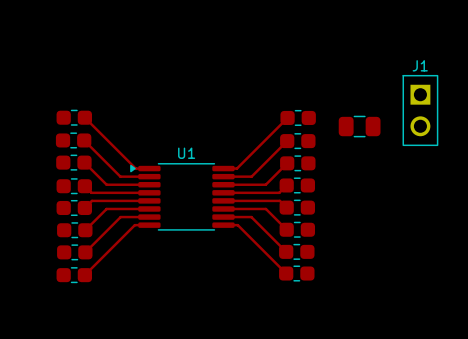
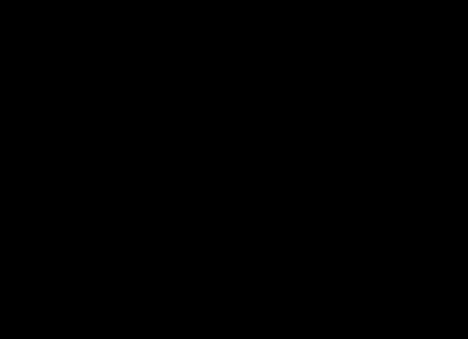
J1: (420, 110) -> none
part: (74, 117) -> none
top track: (84, 117) (135, 168) (149, 168) -> none
top track: (287, 117) (236, 168) (223, 168) -> none
part: (298, 117) -> none
part: (359, 126) -> none
part: (73, 140) -> none
top track: (84, 140) (120, 176) (149, 176) -> none
top track: (287, 141) (251, 176) (223, 176) -> none
part: (297, 141) -> none
part: (73, 162) -> none
top track: (84, 162) (106, 184) (149, 184) -> none
top track: (287, 163) (265, 184) (223, 184) -> none
part: (297, 163) -> none
top track: (286, 185) (279, 192) (223, 192) -> none
part: (297, 185) -> none
part: (74, 186) -> none
top track: (84, 186) (91, 192) (149, 192) -> none
U1: (182, 196) -> none
top track: (149, 200) (91, 200) (84, 207) -> none
top track: (223, 200) (279, 200) (286, 207) -> none
part: (74, 207) -> none
part: (297, 207) -> none
top track: (149, 208) (106, 208) (85, 230) -> none
top track: (223, 208) (265, 208) (286, 229) -> none
top track: (149, 217) (120, 217) (85, 252) -> none
top track: (223, 217) (251, 217) (286, 251) -> none
top track: (149, 225) (134, 225) (84, 275) -> none
top track: (223, 225) (237, 225) (286, 273) -> none
part: (297, 229) -> none
part: (74, 230) -> none
part: (296, 251) -> none
part: (74, 252) -> none
part: (296, 273) -> none
part: (74, 275) -> none

